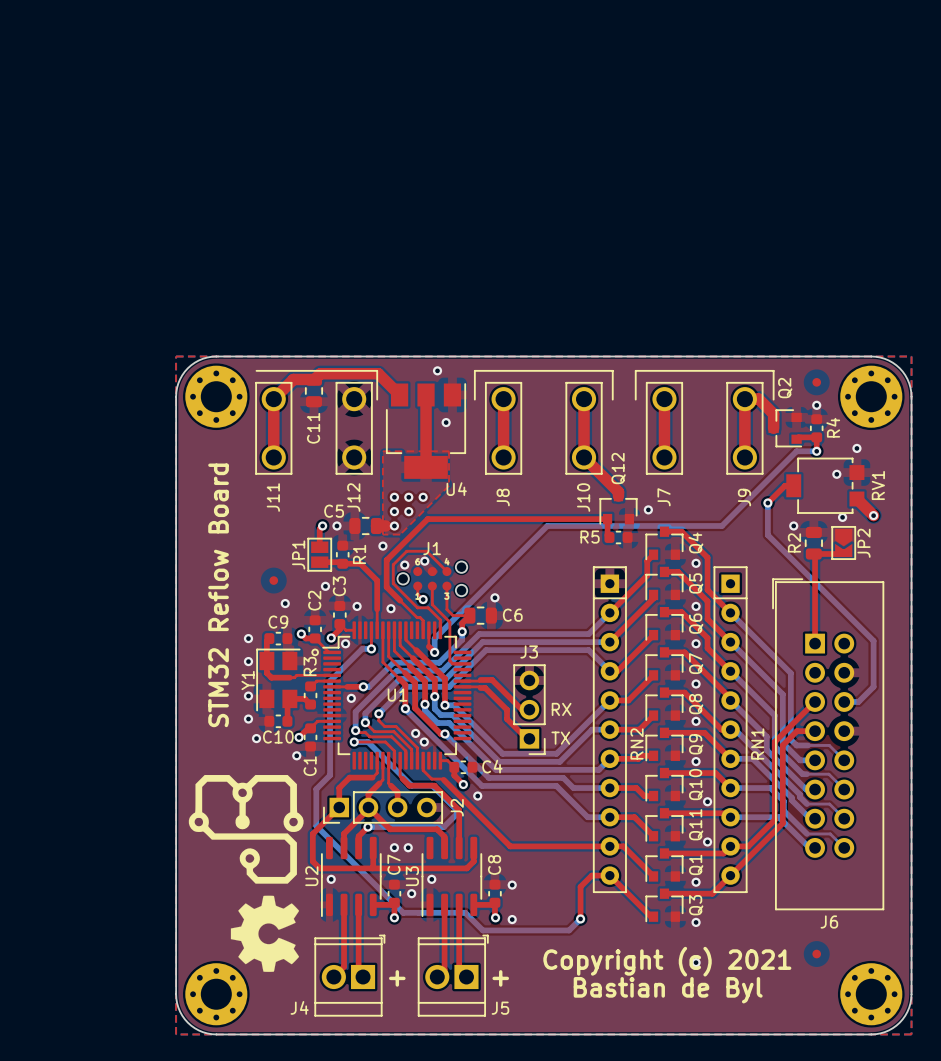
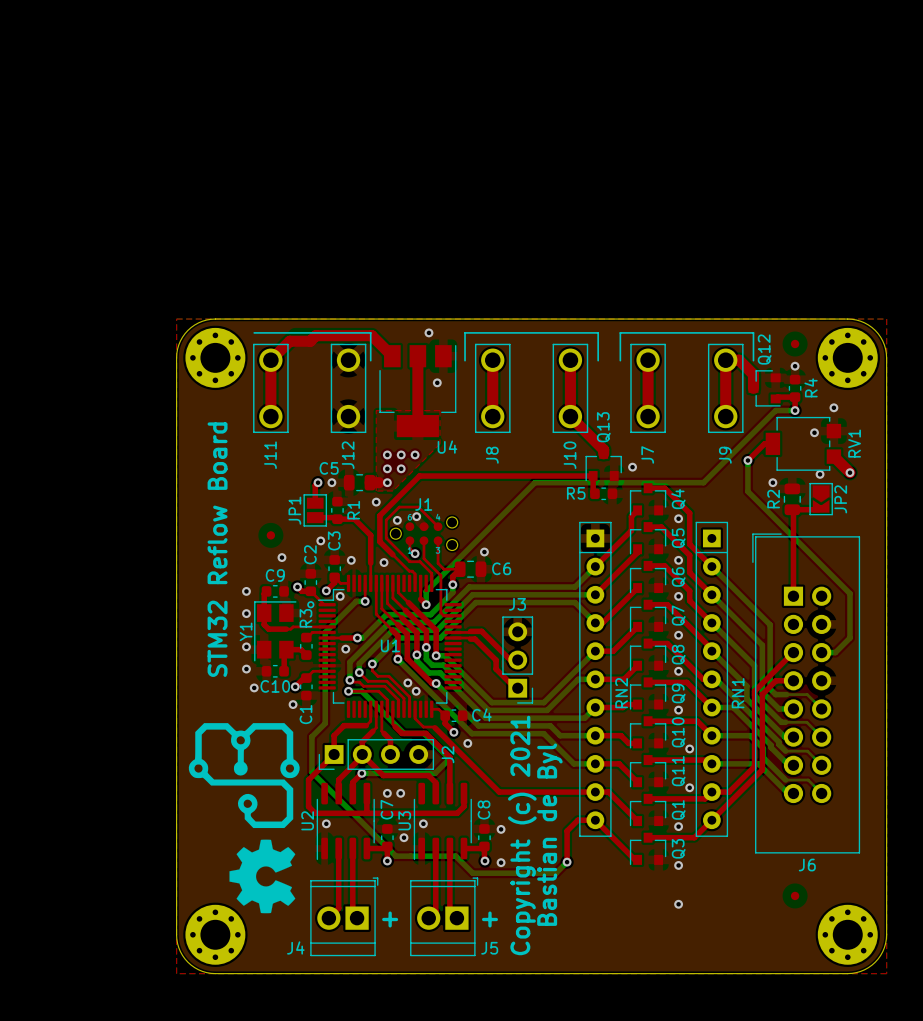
Q2 name: Q2 (785, 388) -> Q12 (764, 349)
C11: (313, 390) -> none
Q12 name: Q12 (618, 468) -> Q13 (603, 427)
text: RX (561, 709) -> none
text: TX (560, 738) -> none
text rotation: 0° (667, 961) -> 90° counterclockwise (522, 835)
text rotation: 0° (668, 990) -> 90° counterclockwise (549, 834)

